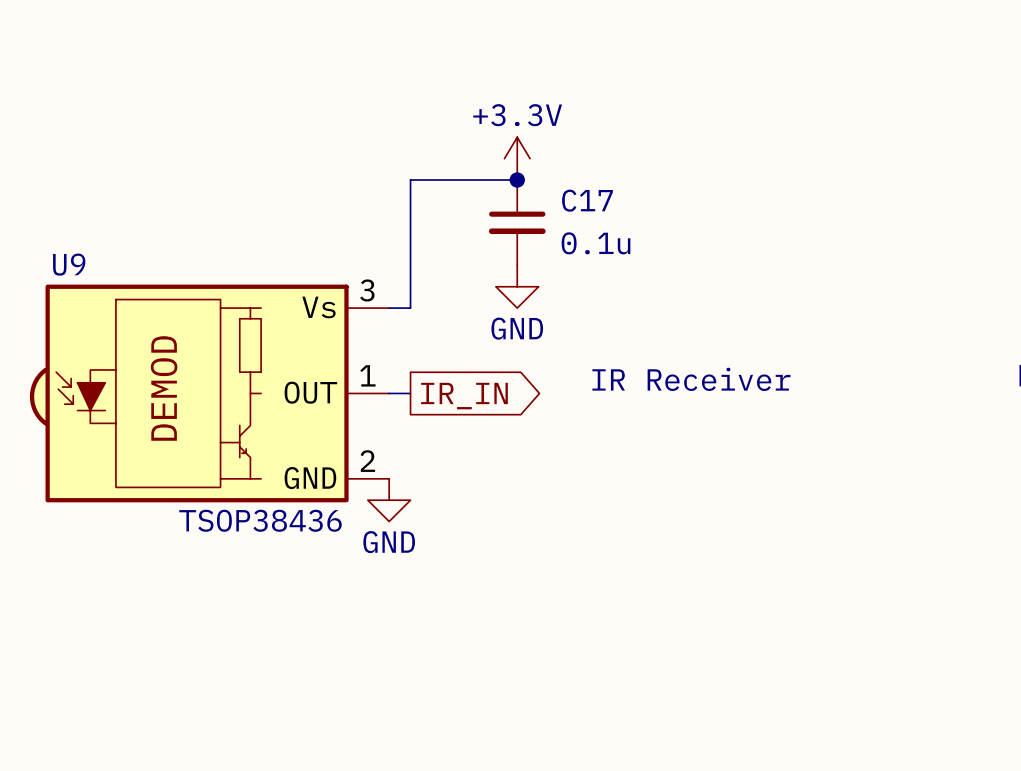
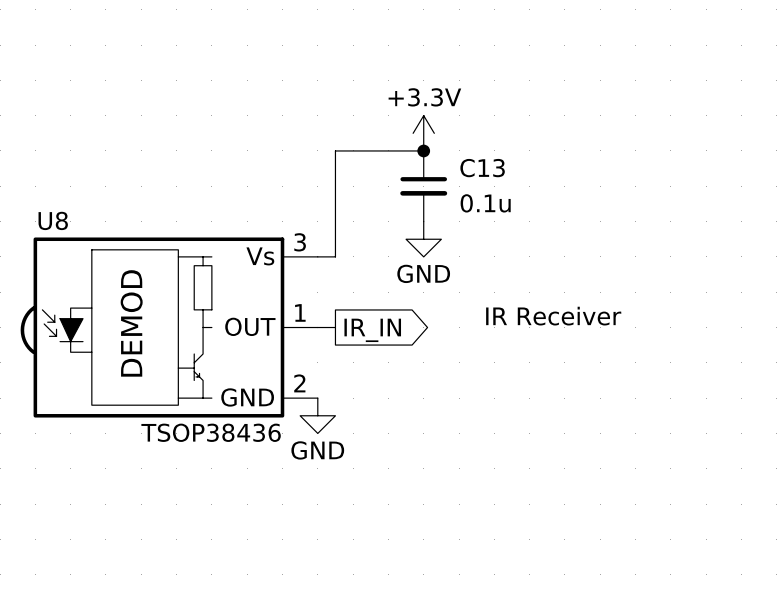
C17 name: C17 (587, 200) -> C13 (482, 168)
U9 name: U9 (69, 264) -> U8 (53, 220)

